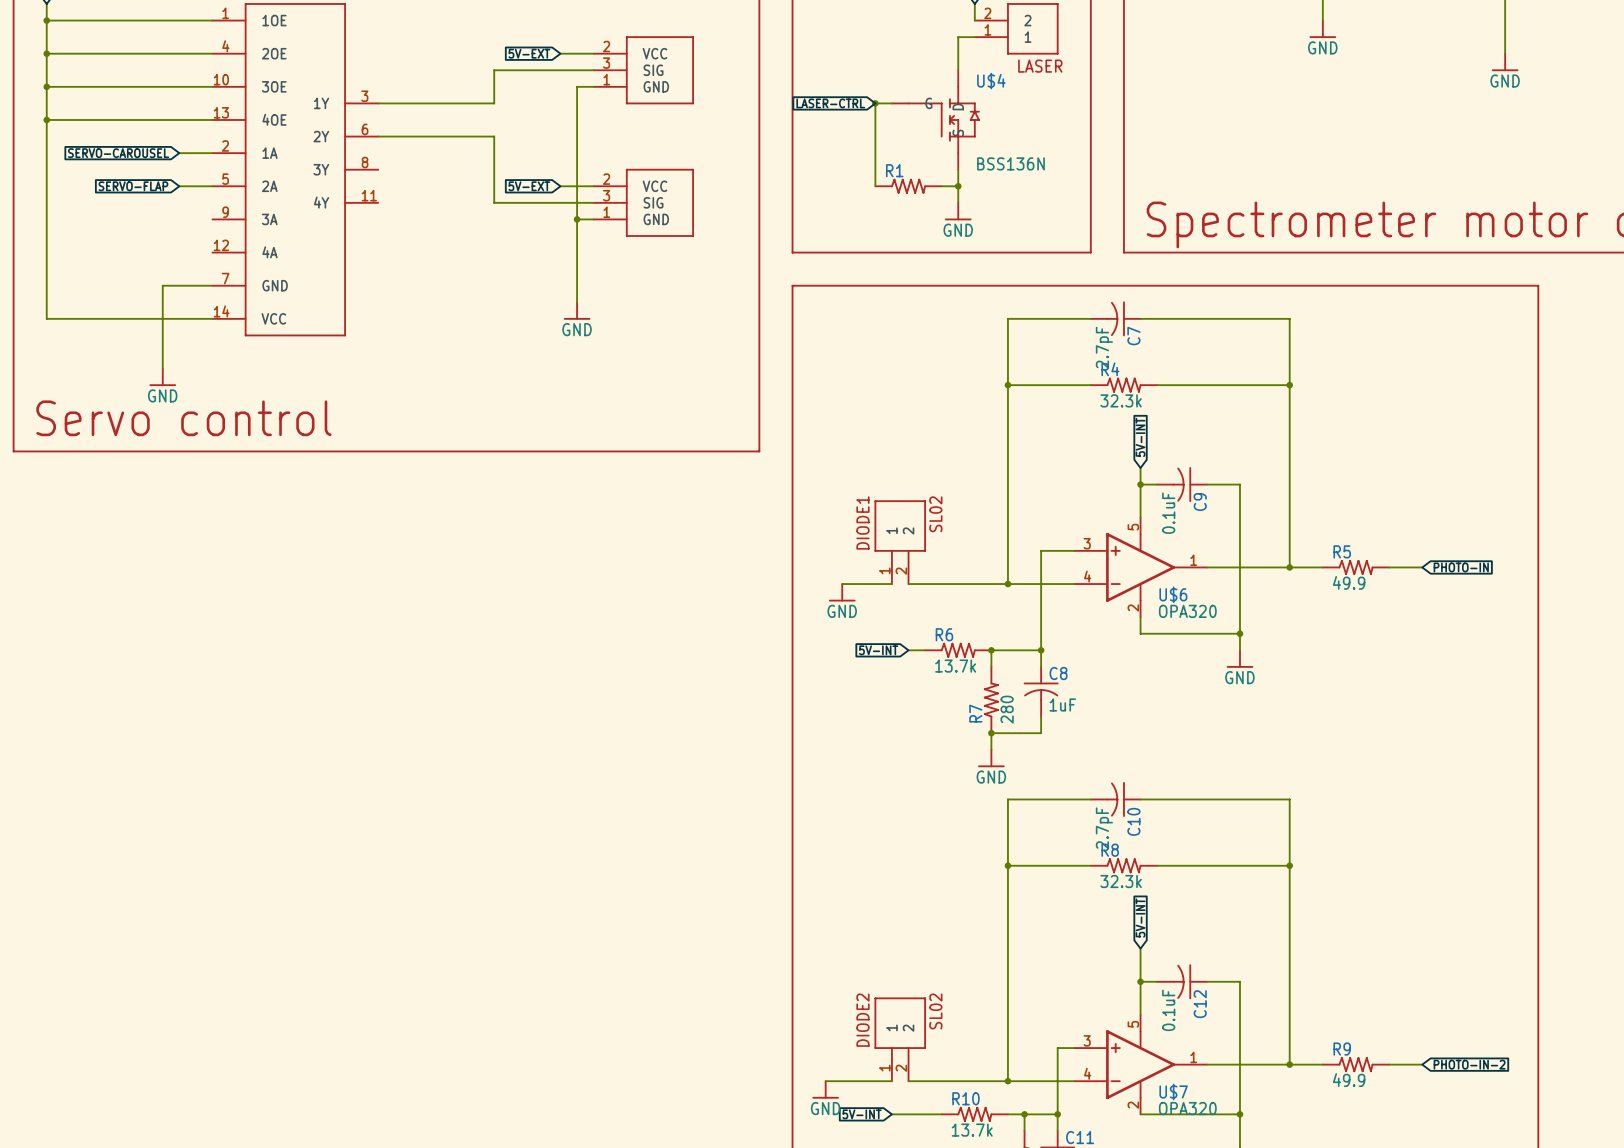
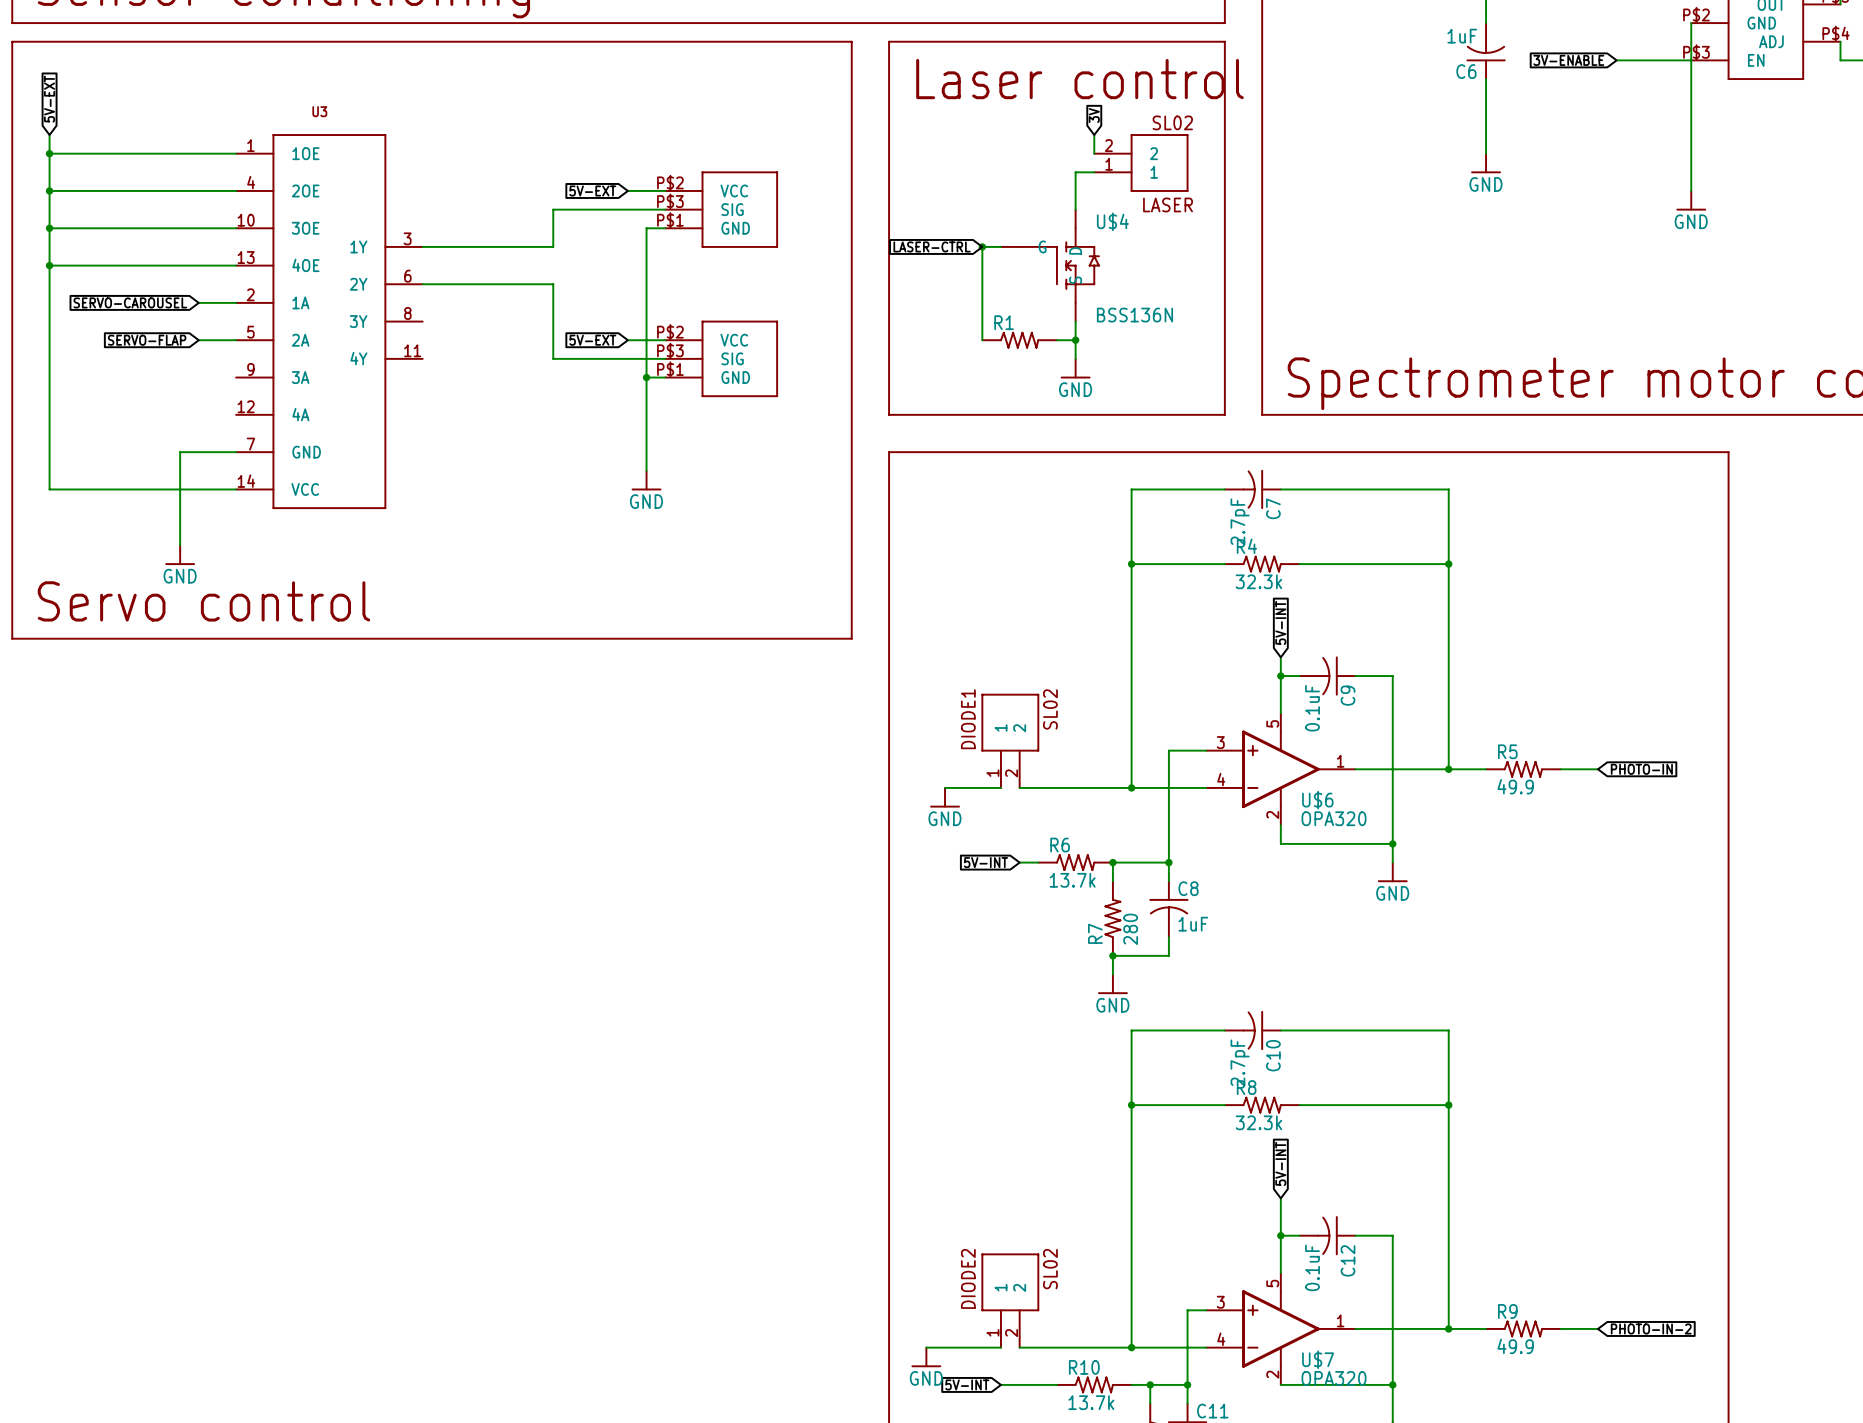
part pin number: 2 (606, 46) -> P$2 (670, 182)
part pin number: 3 (606, 63) -> P$3 (670, 201)
part pin number: 1 (606, 79) -> P$1 (670, 220)
part pin number: 2 (606, 179) -> P$2 (670, 332)
part pin number: 3 (606, 195) -> P$3 (670, 350)
part pin number: 1 (606, 212) -> P$1 (670, 369)

